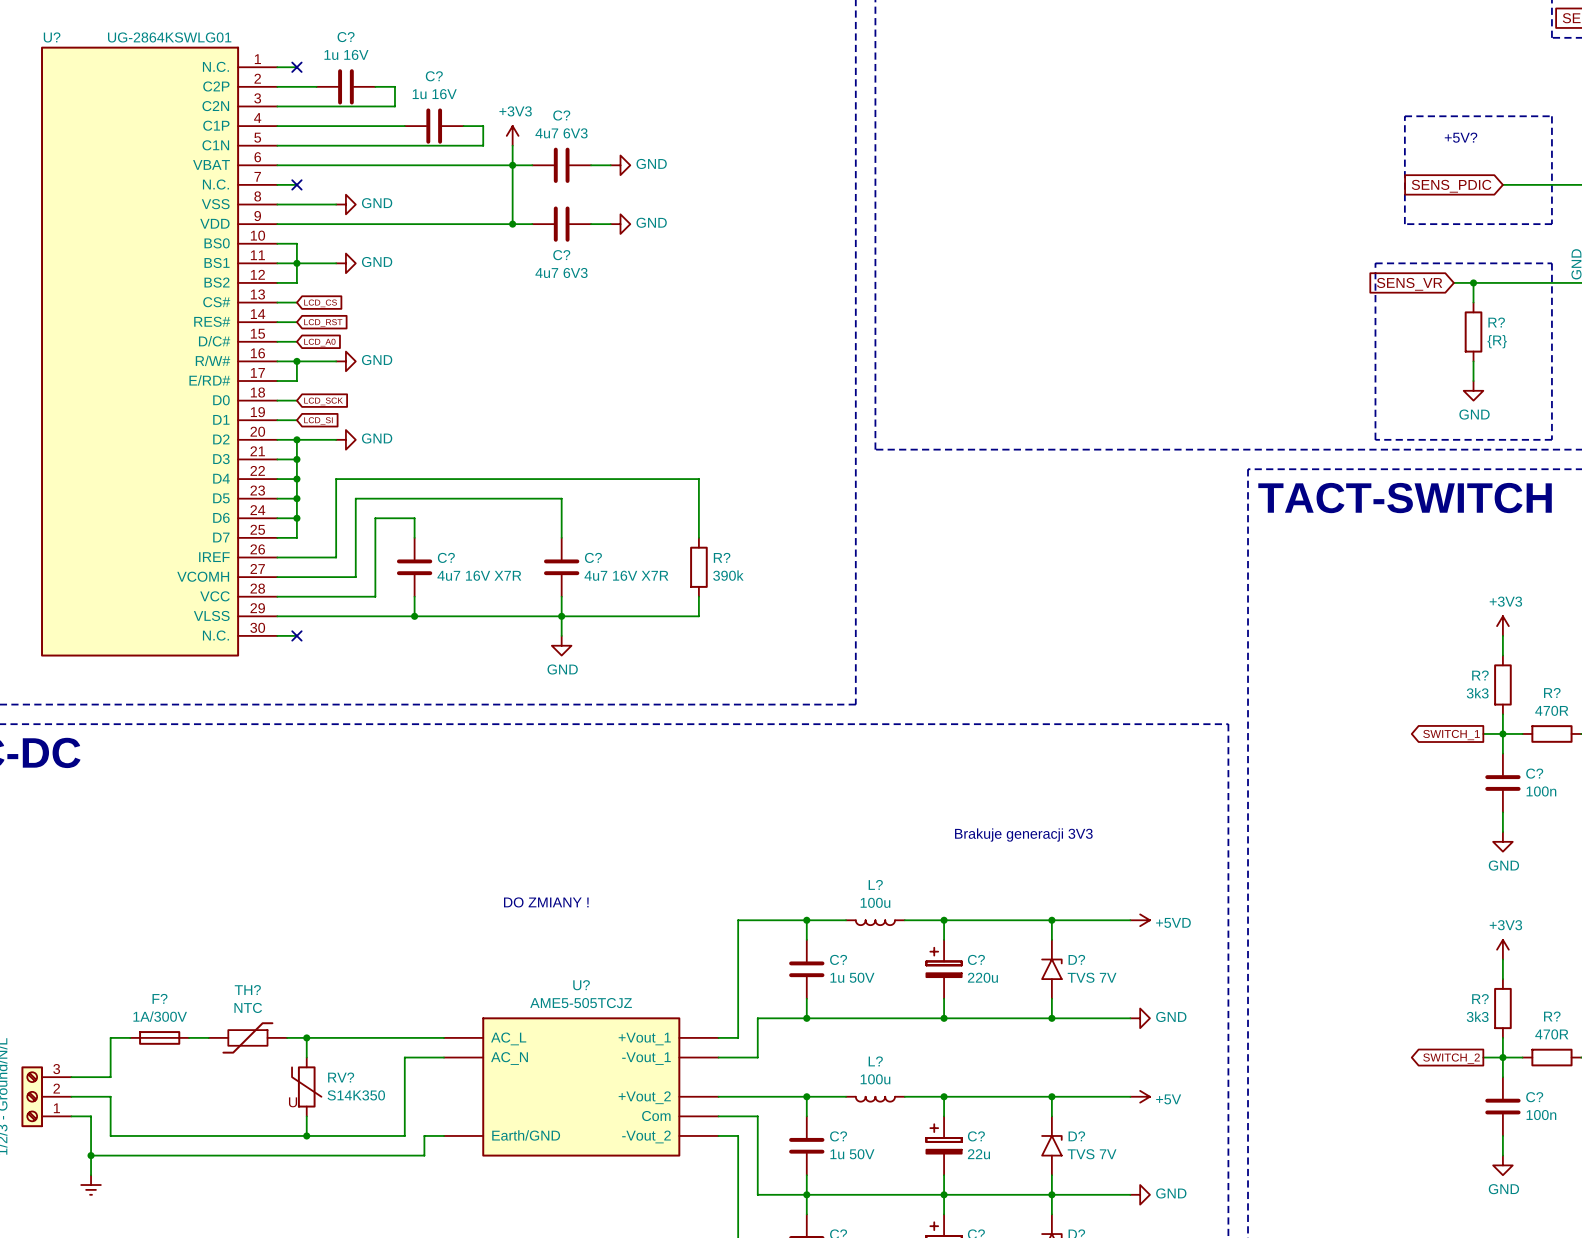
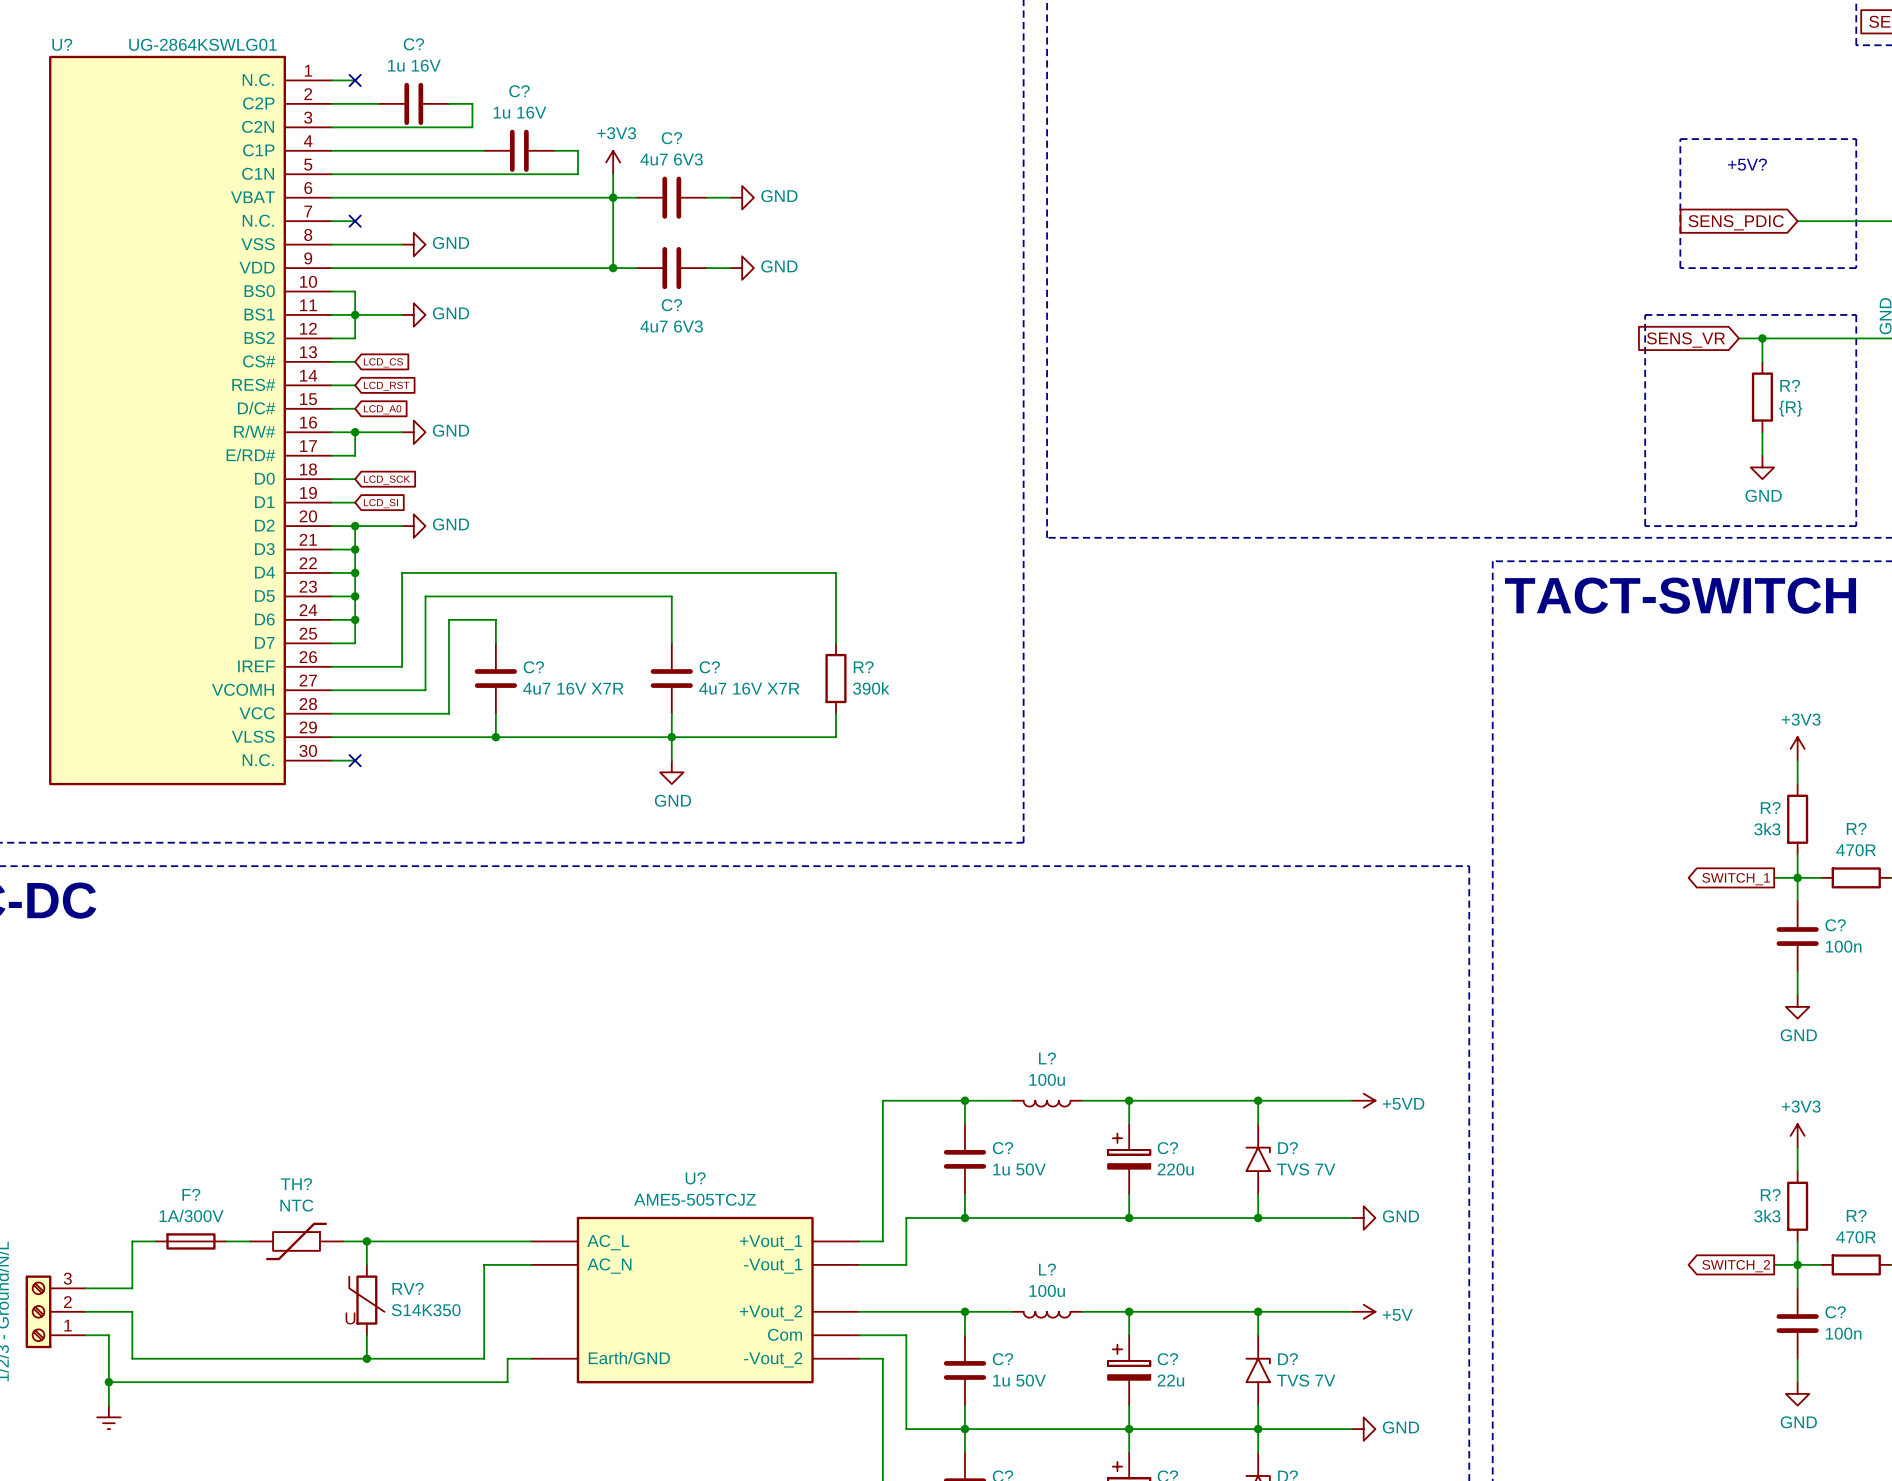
text: Brakuje generacji 3V3 (1023, 835) -> none
text: DO ZMIANY ! (546, 902) -> none

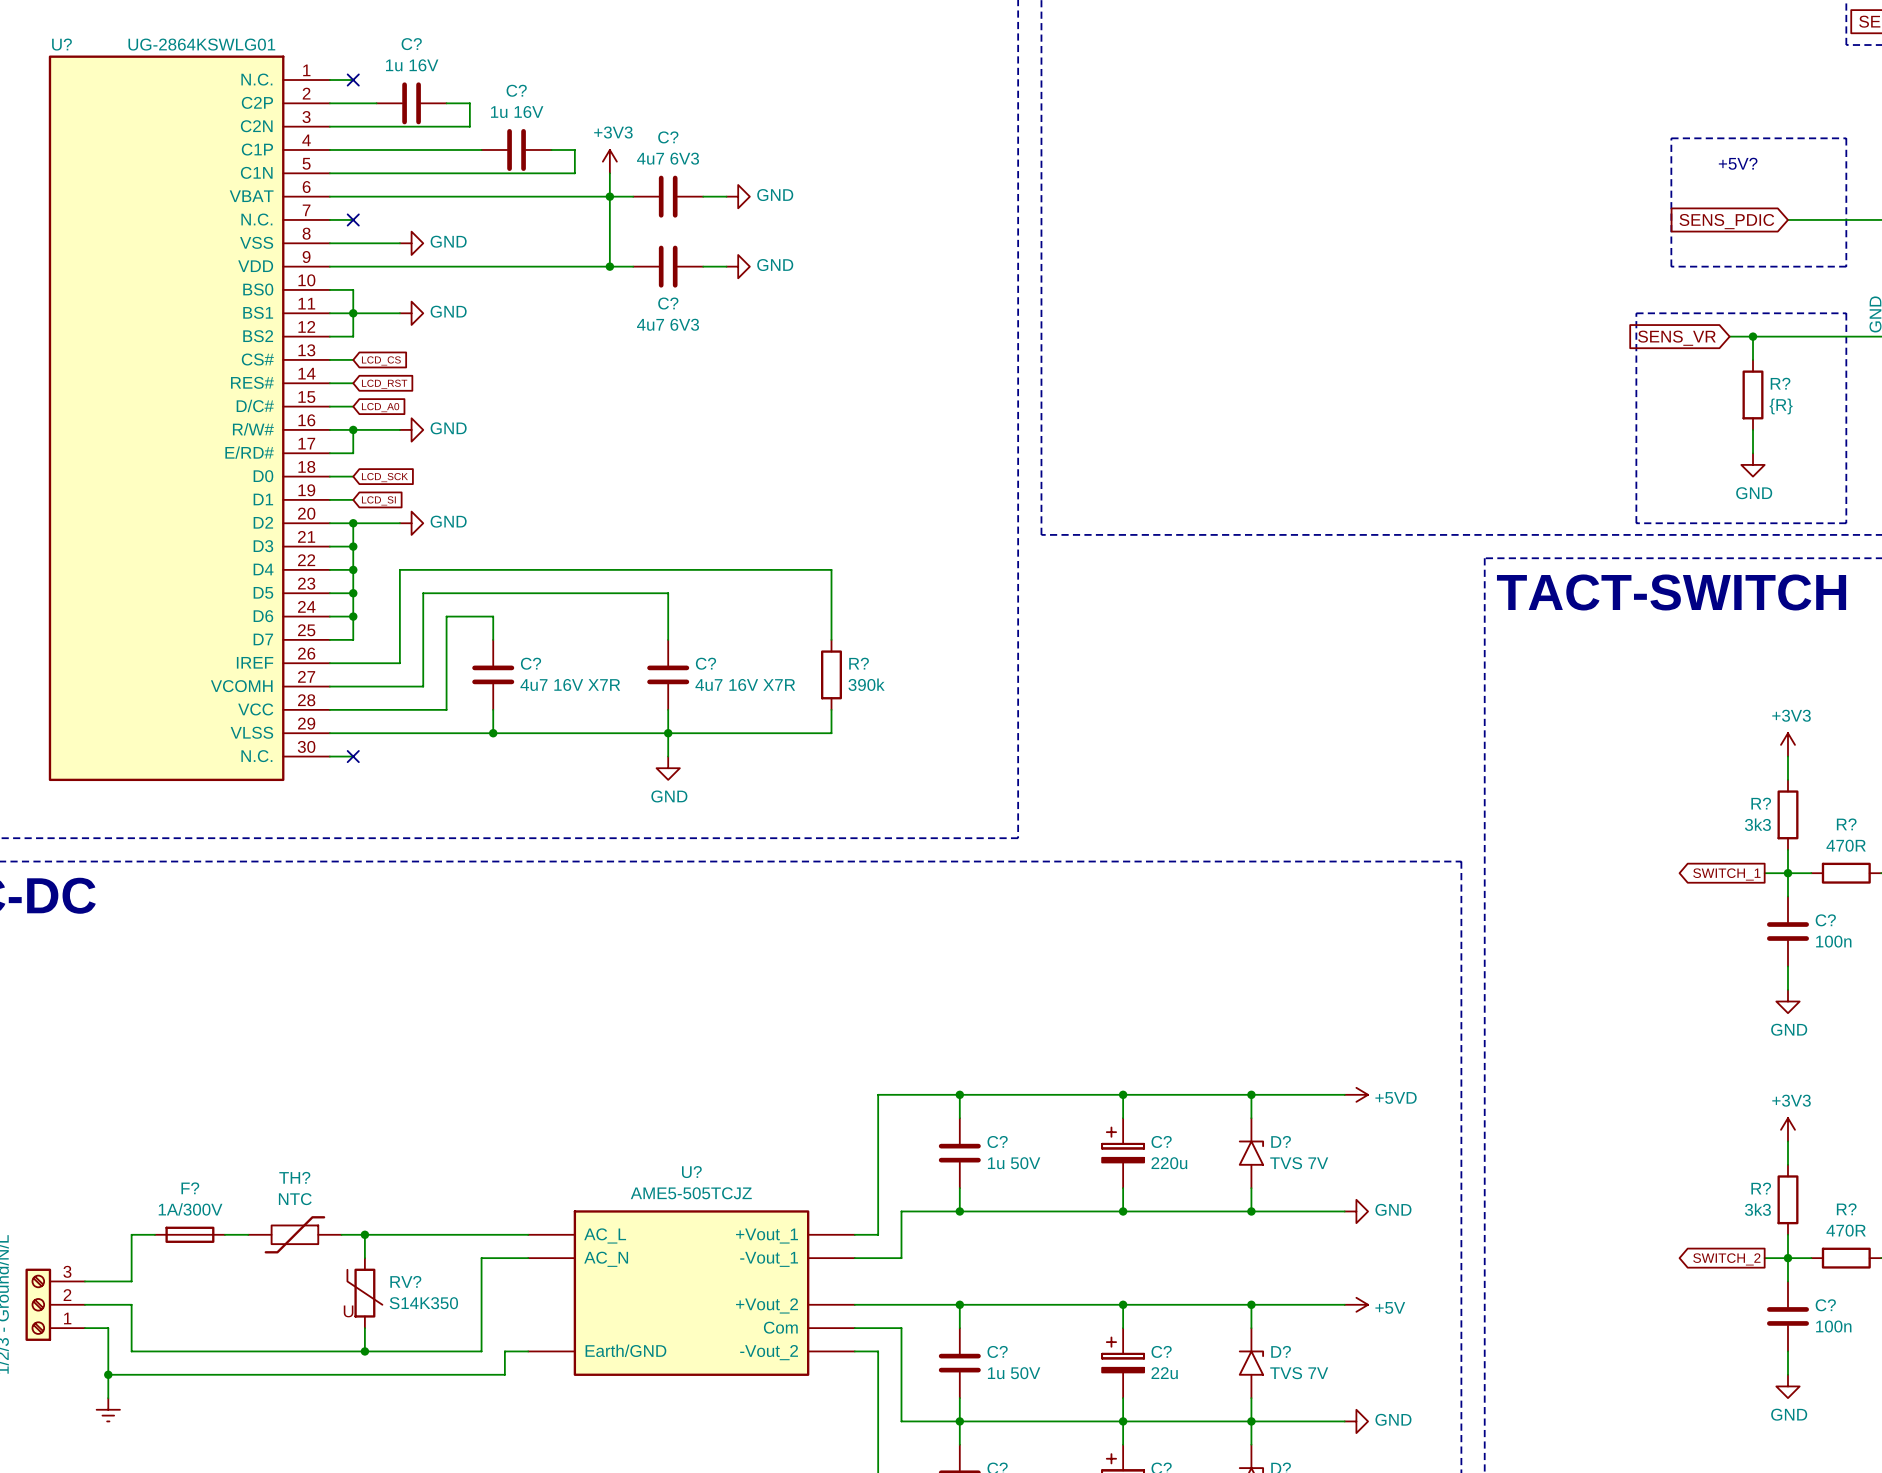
wire: none -> (1006, 1094) (1076, 1094)
L?: 100u (1047, 1103) -> none
wire: none -> (1006, 1304) (1076, 1304)
L?: 100u (1047, 1314) -> none

